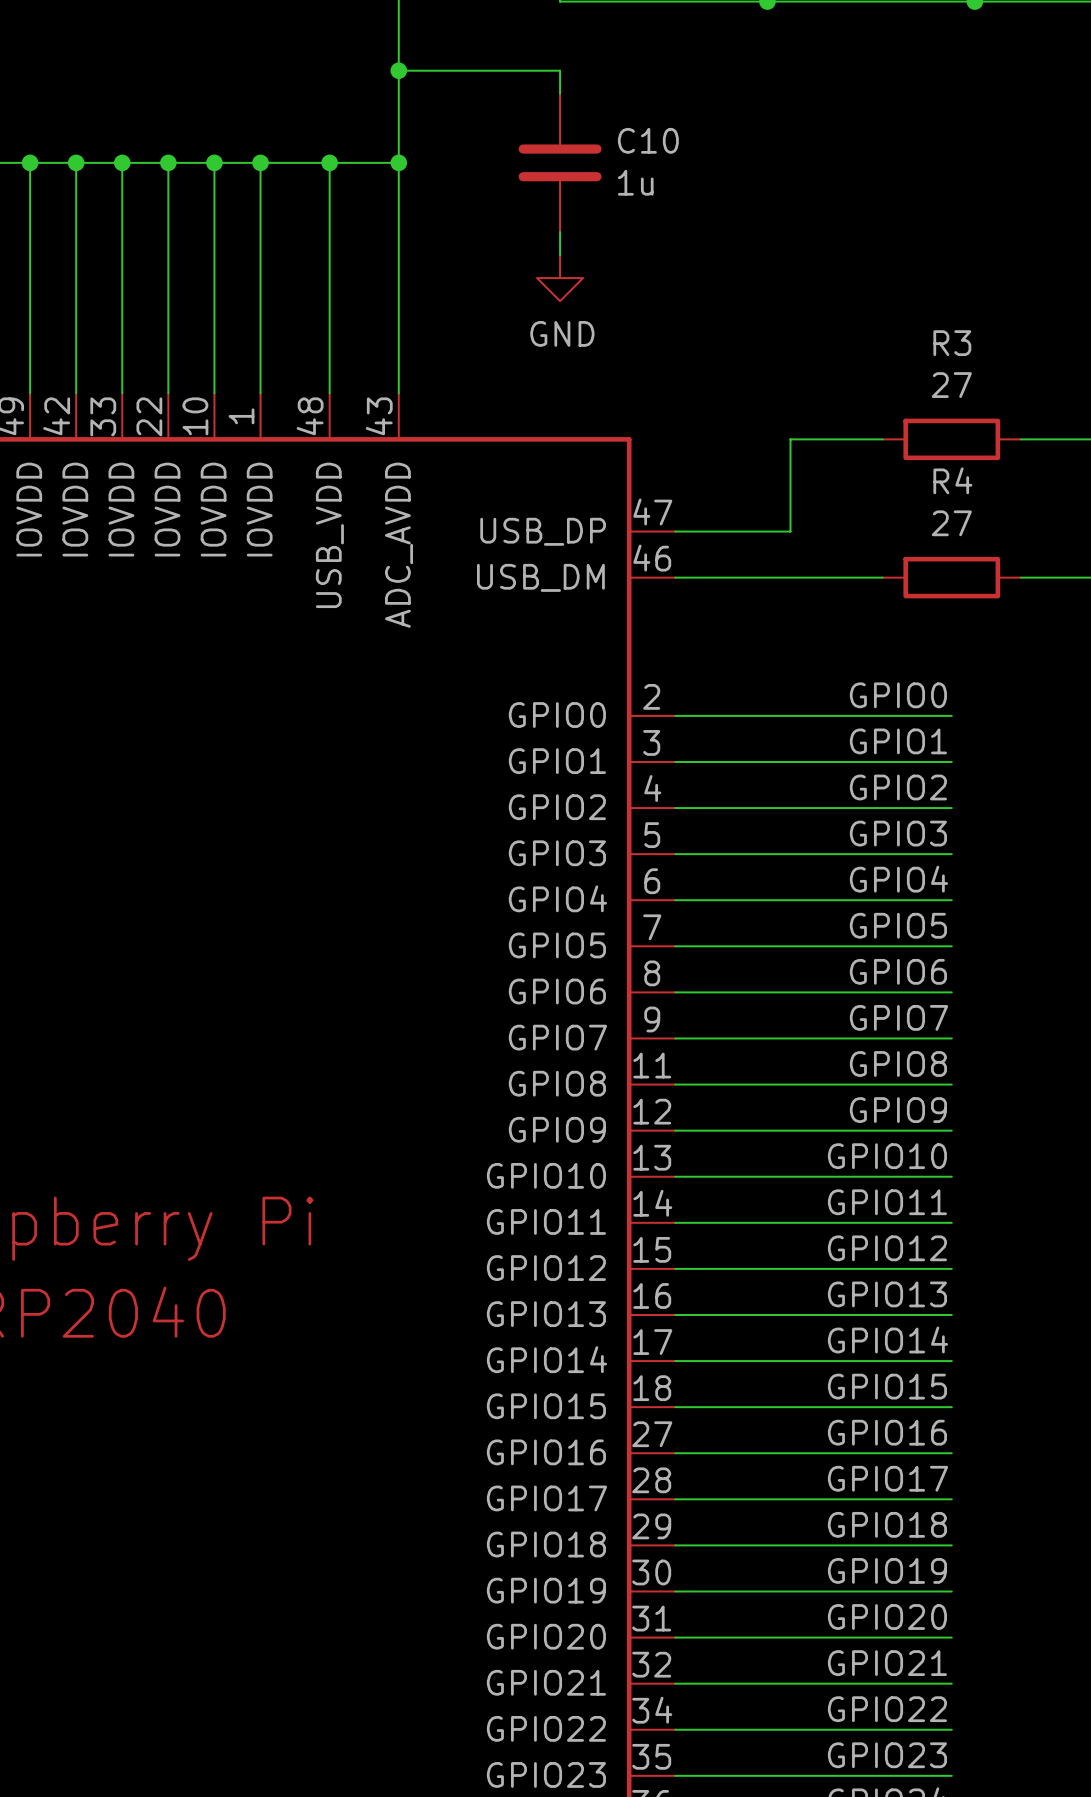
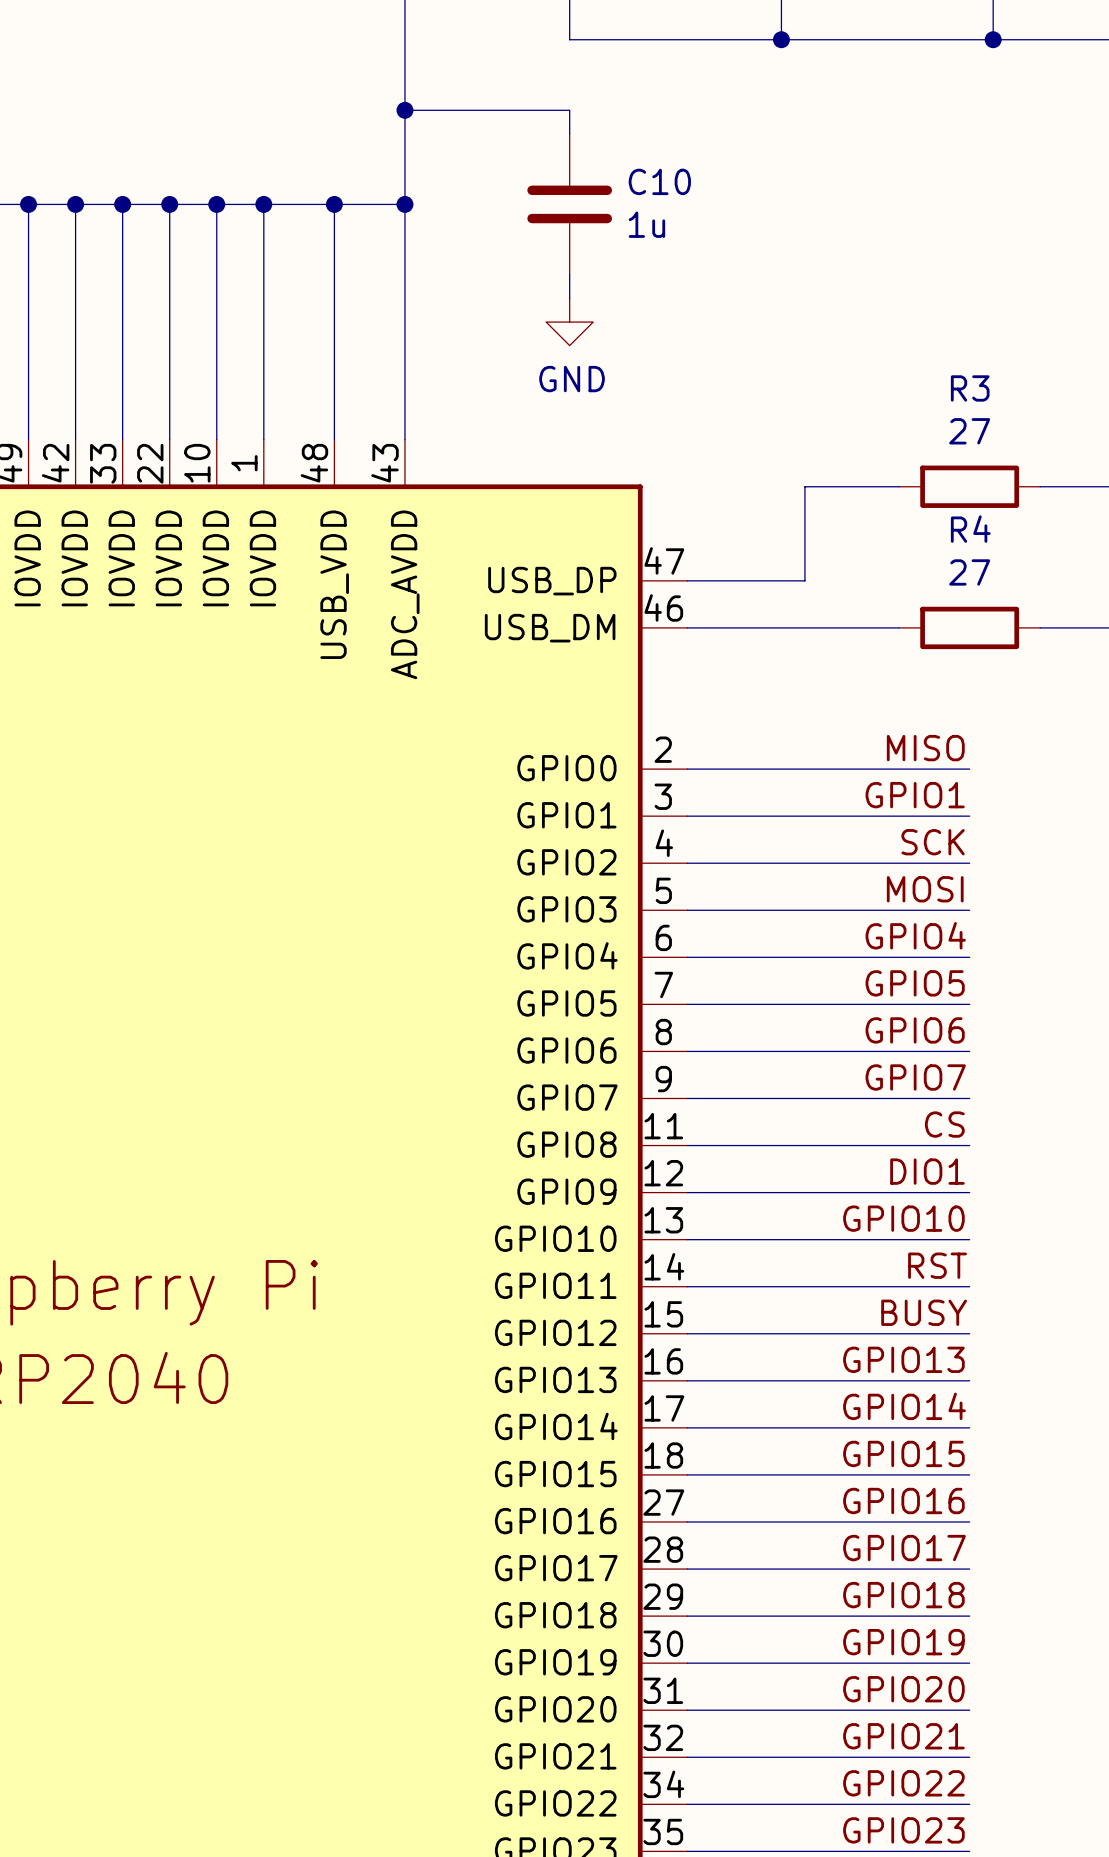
label: GPIO0 (898, 695) -> MISO (925, 748)
label: GPIO2 (898, 787) -> SCK (933, 842)
label: GPIO3 (898, 833) -> MOSI (925, 889)
label: GPIO8 (898, 1064) -> CS (944, 1124)
label: GPIO9 (898, 1110) -> DIO1 (927, 1171)
label: GPIO11 (887, 1202) -> RST (937, 1265)
label: GPIO12 (887, 1248) -> BUSY (924, 1312)

